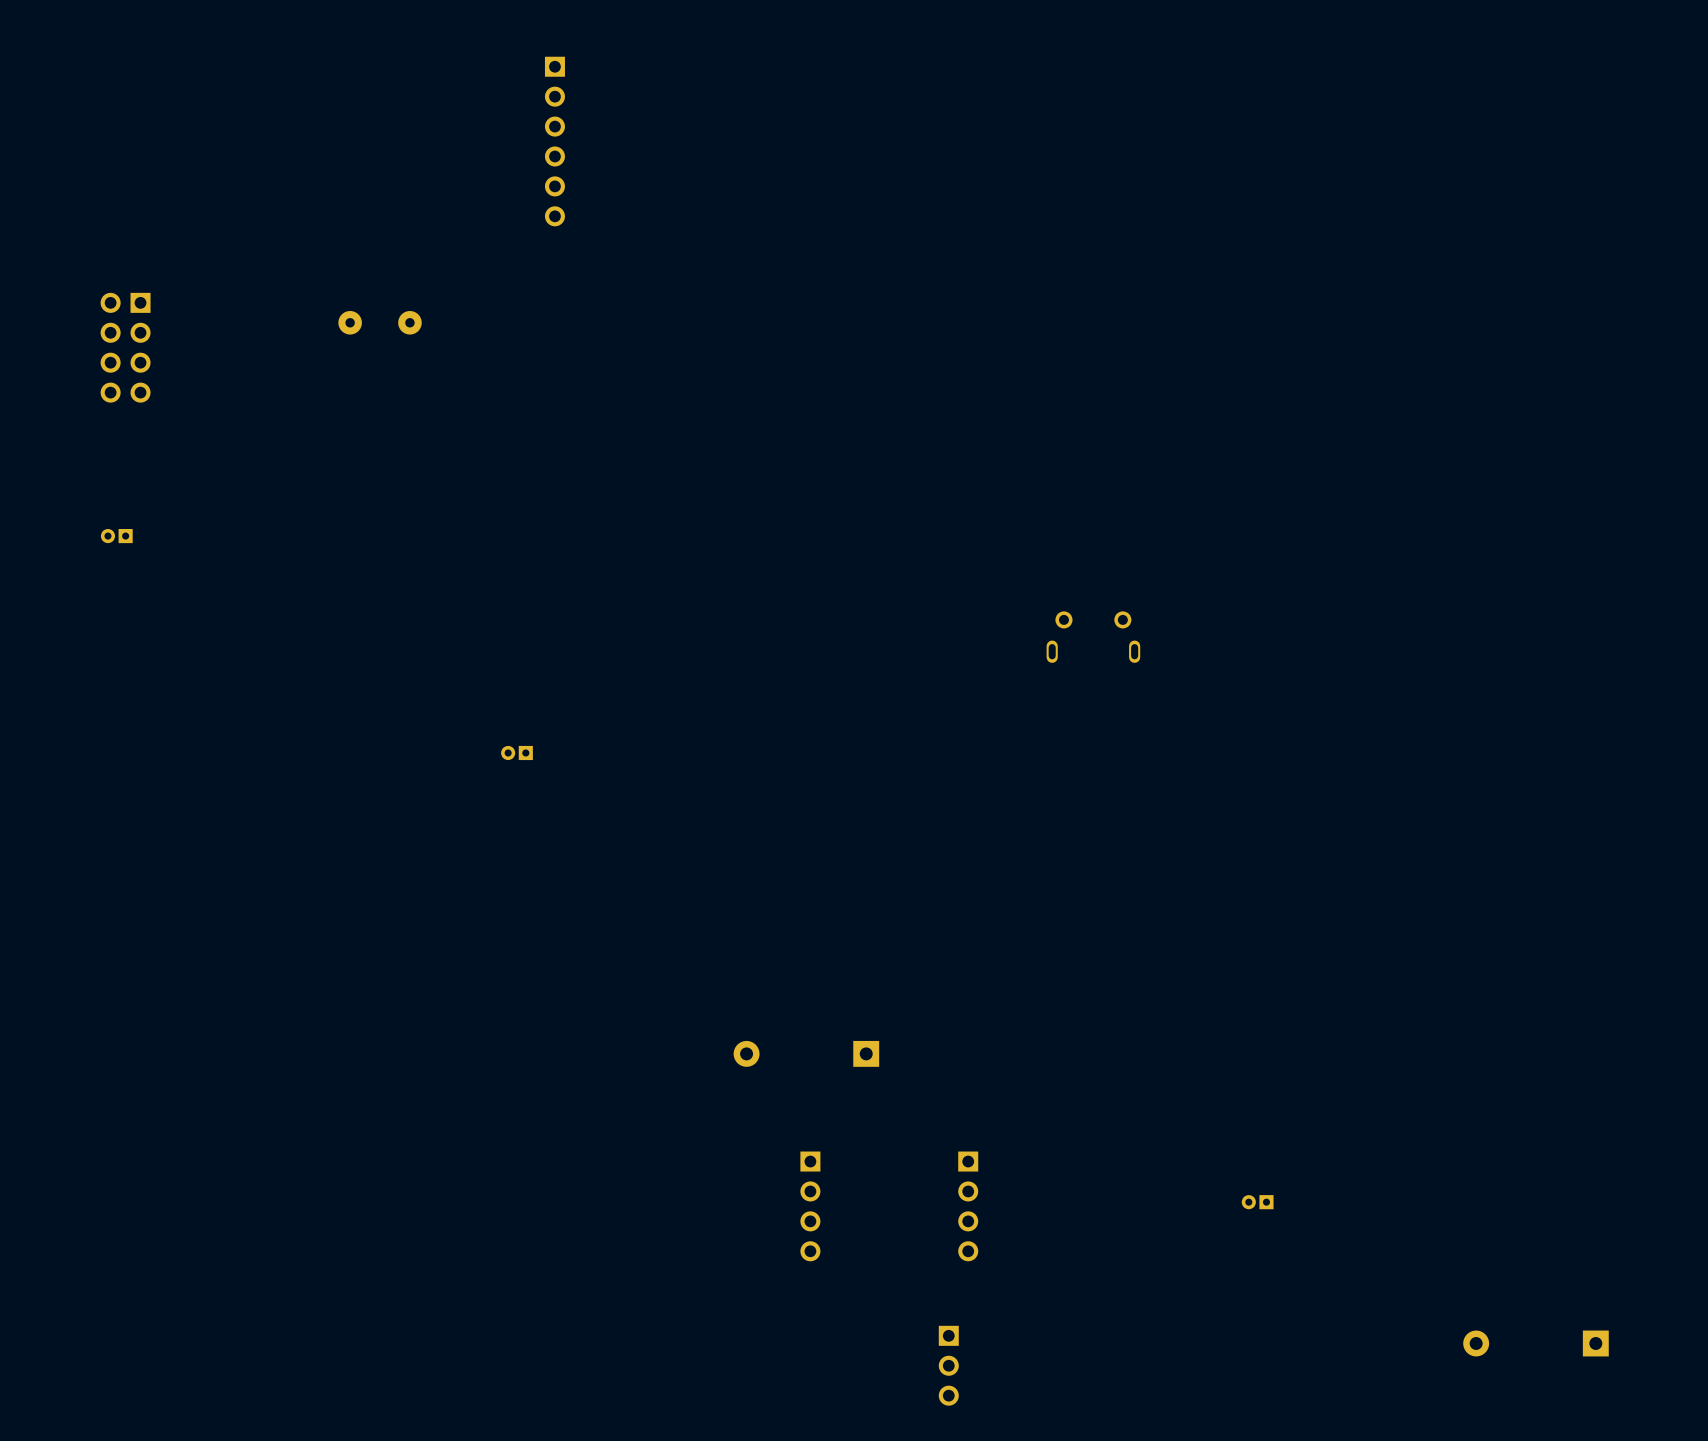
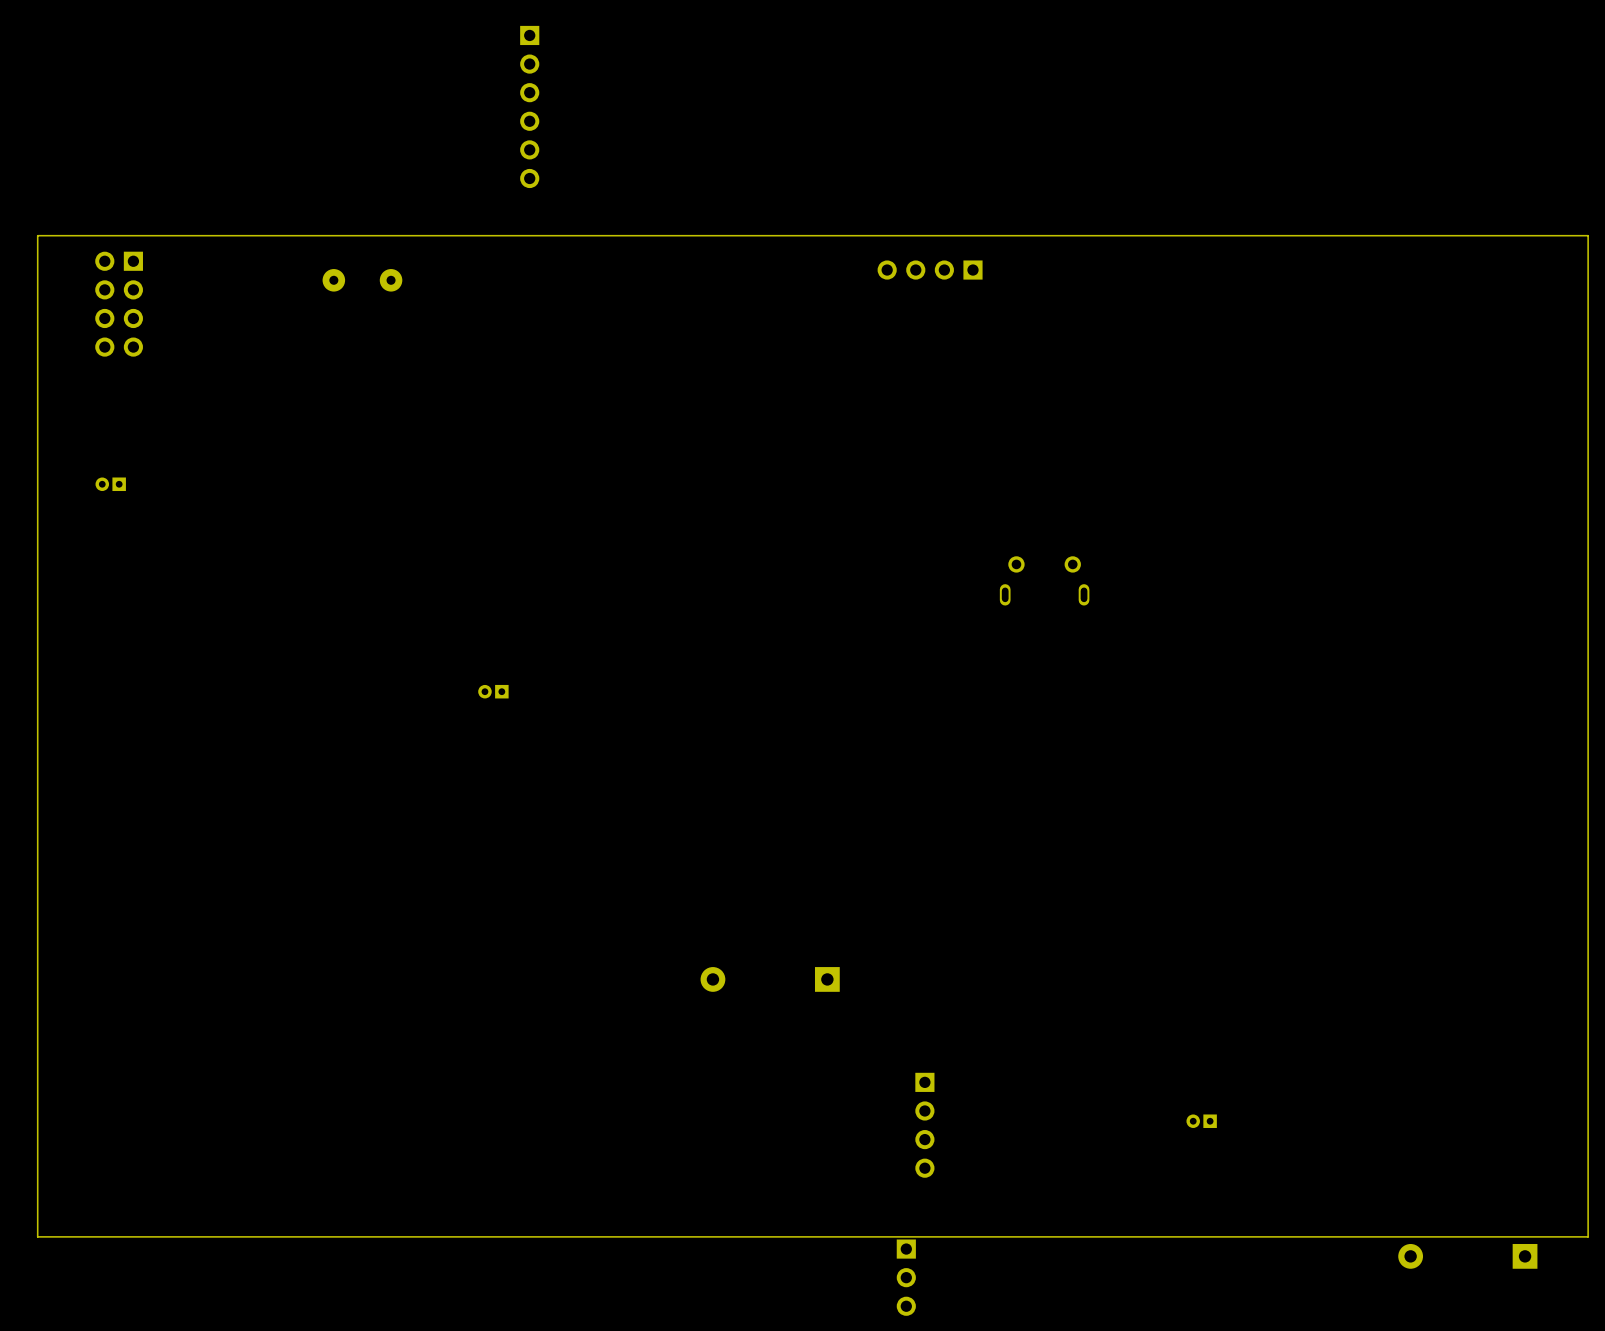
board edge: none -> (1588, 235) (37, 235) (37, 1236) (1588, 1236) (1588, 235)
part: none -> (930, 270)
part: (810, 1206) -> none

